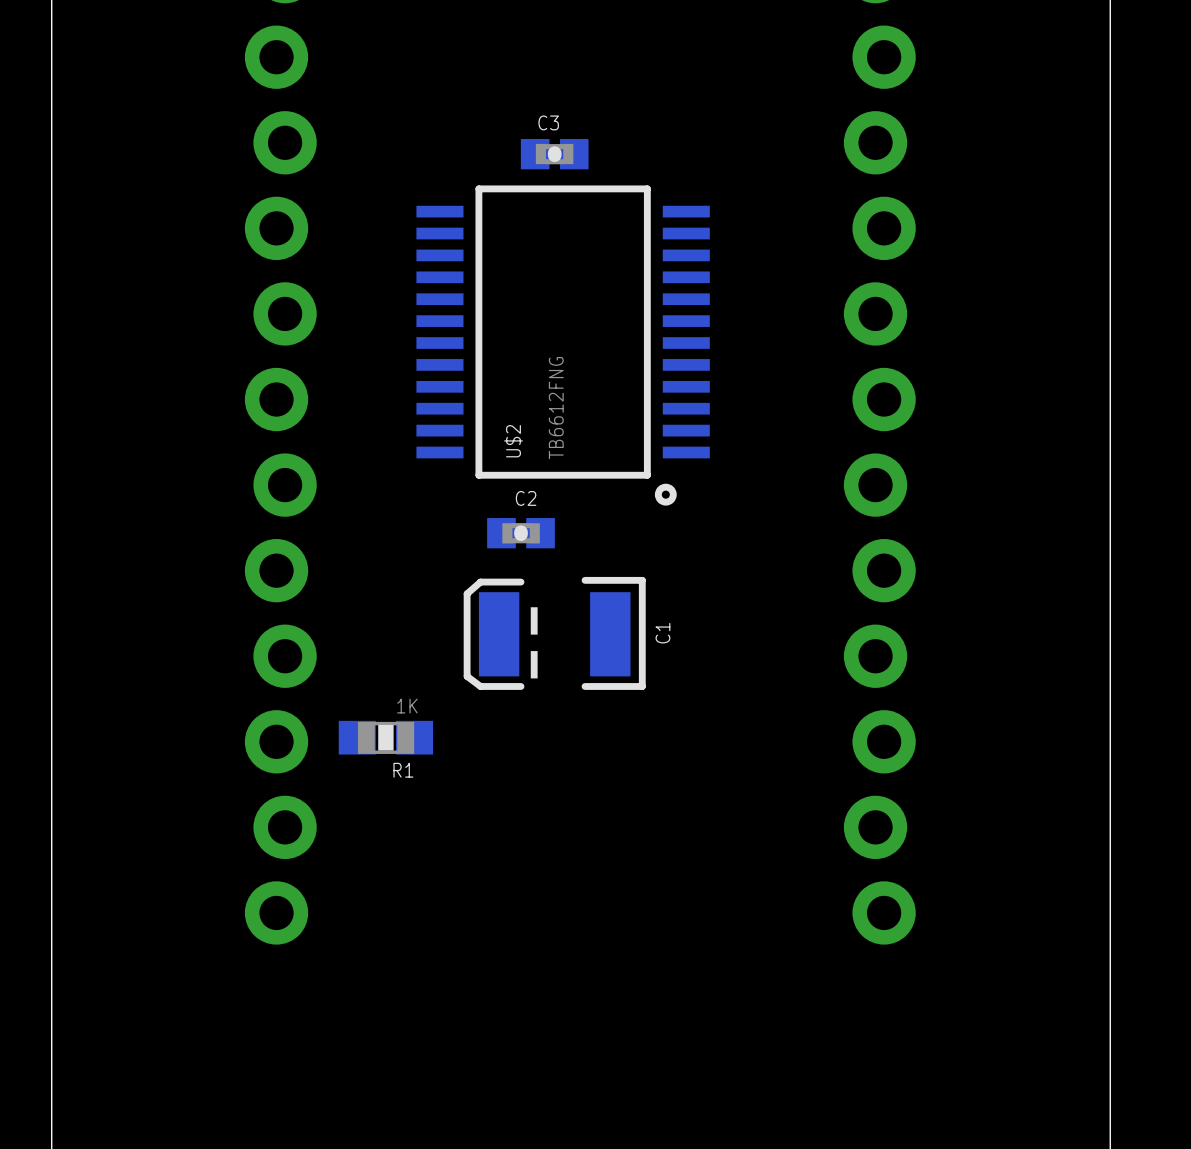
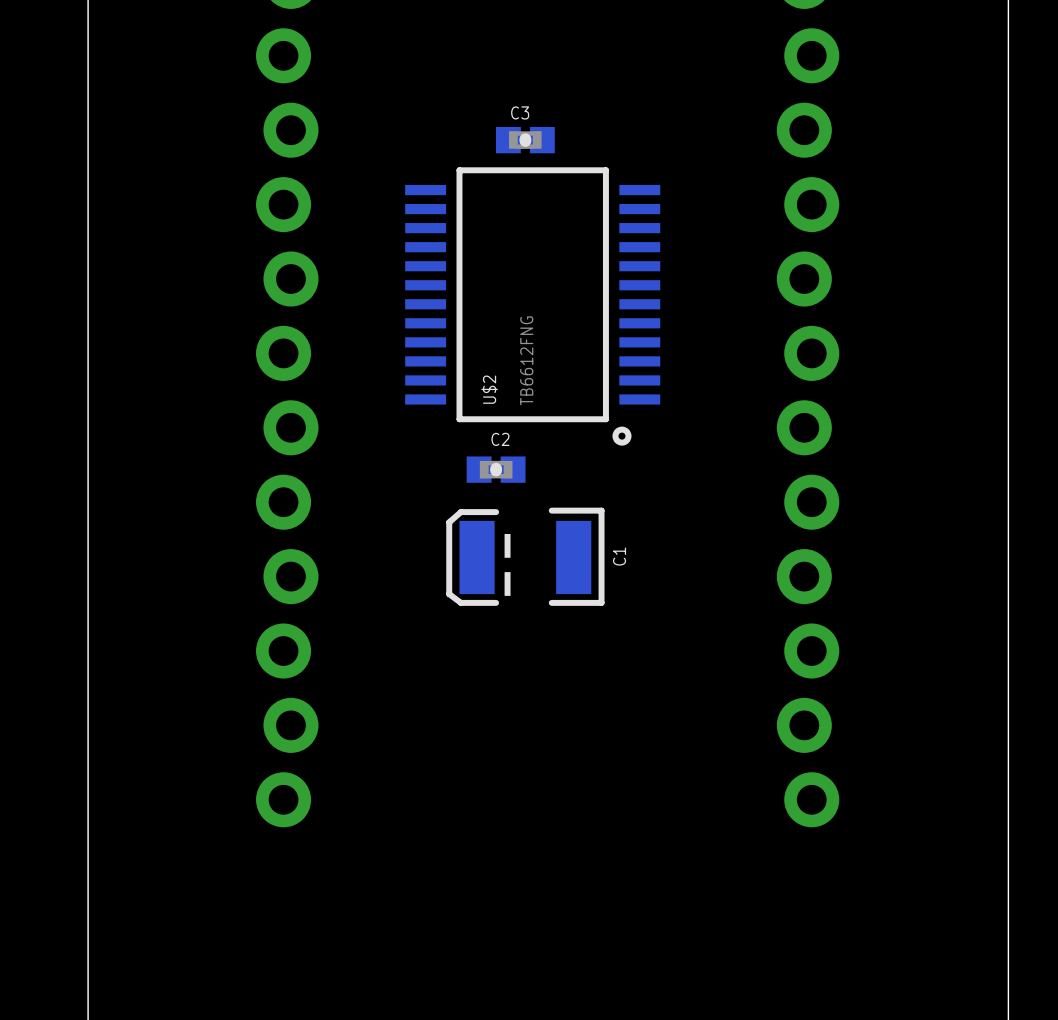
R1: 1K (385, 737) -> none

